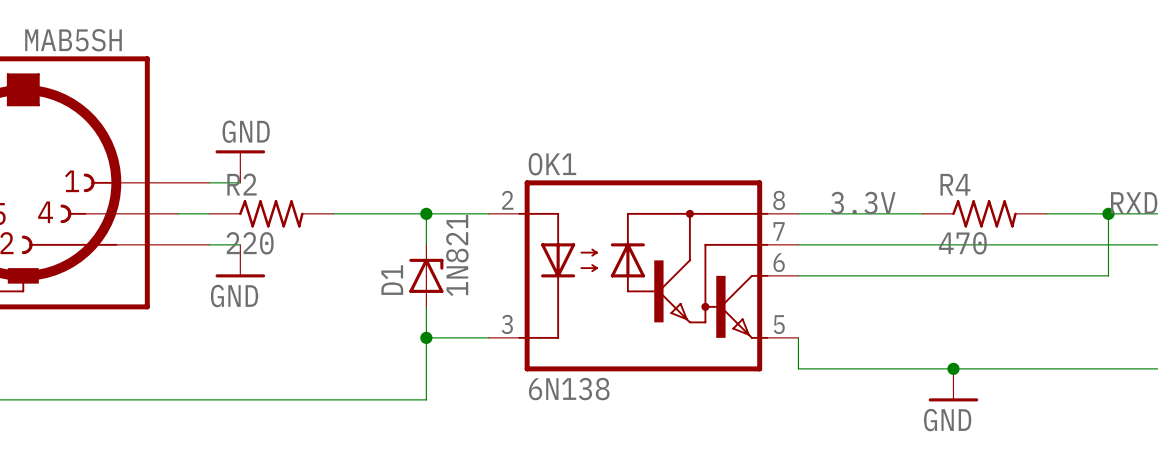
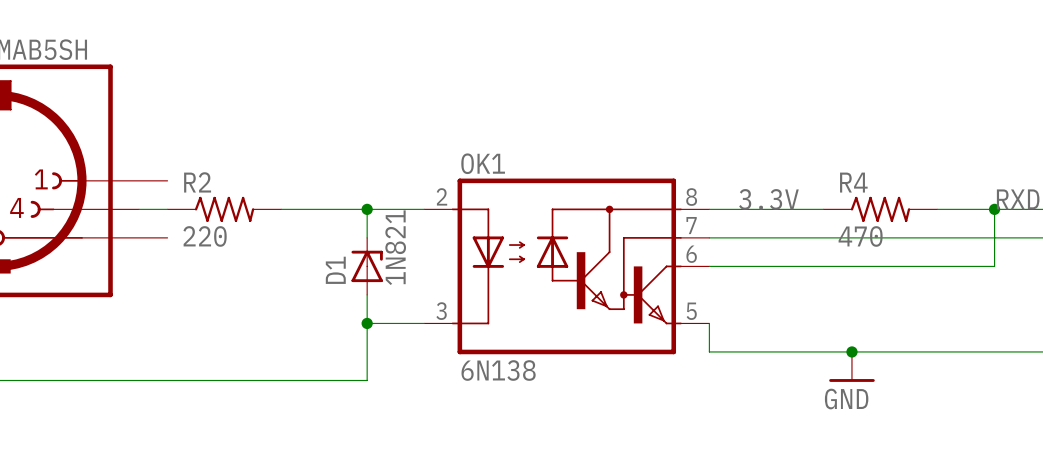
power symbol: GND (240, 166) -> none
wire: (209, 182) (240, 182) -> none
wire: (209, 244) (240, 244) -> none
power symbol: GND (240, 261) -> none

